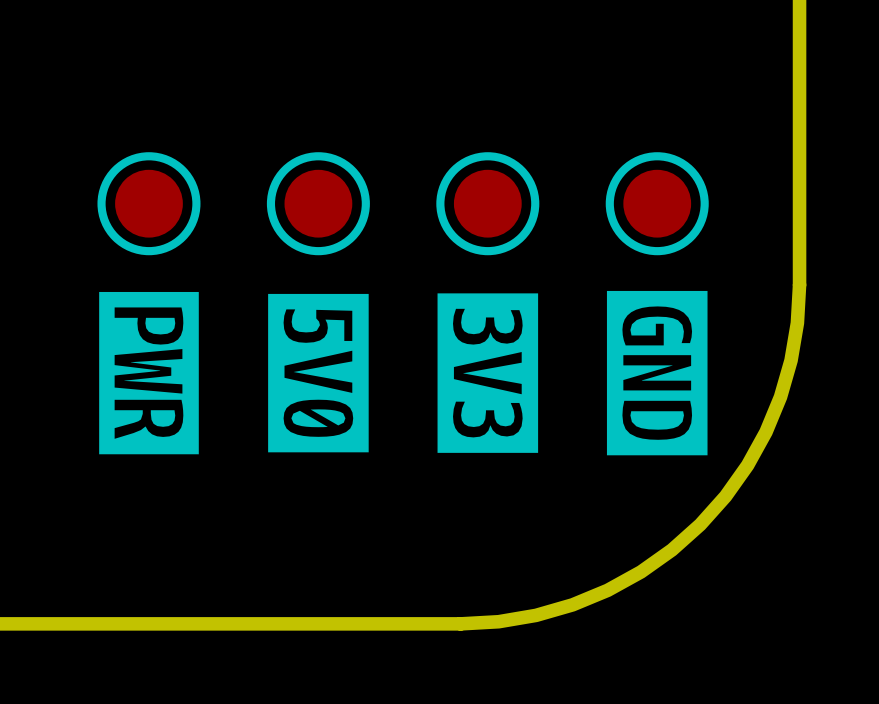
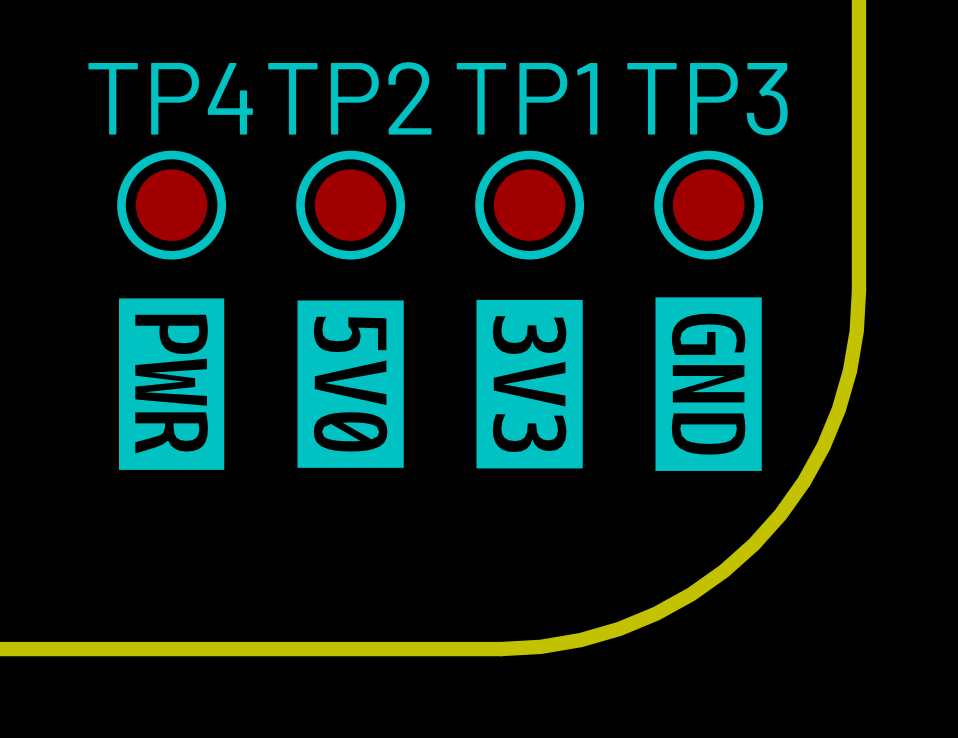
TP2 name: none -> TP2 (349, 98)
TP4 name: none -> TP4 (170, 98)
TP1 name: none -> TP1 (527, 98)
TP3 name: none -> TP3 (707, 99)

